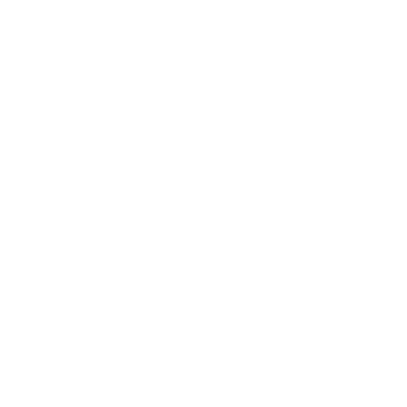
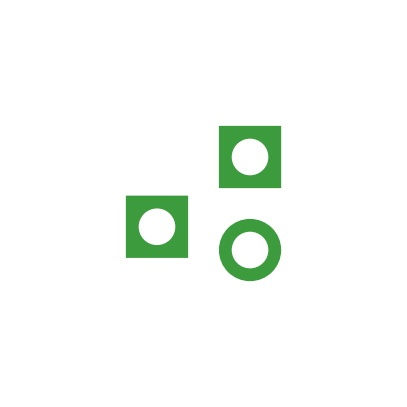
part: none -> (250, 203)
part: none -> (156, 226)

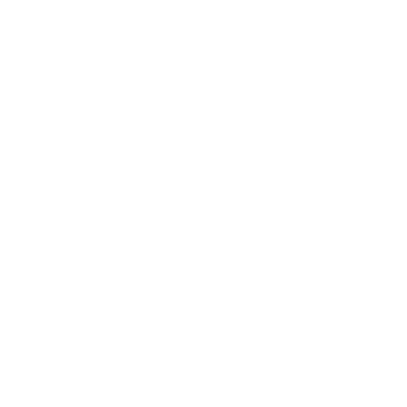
part: (250, 203) -> none
part: (156, 226) -> none

